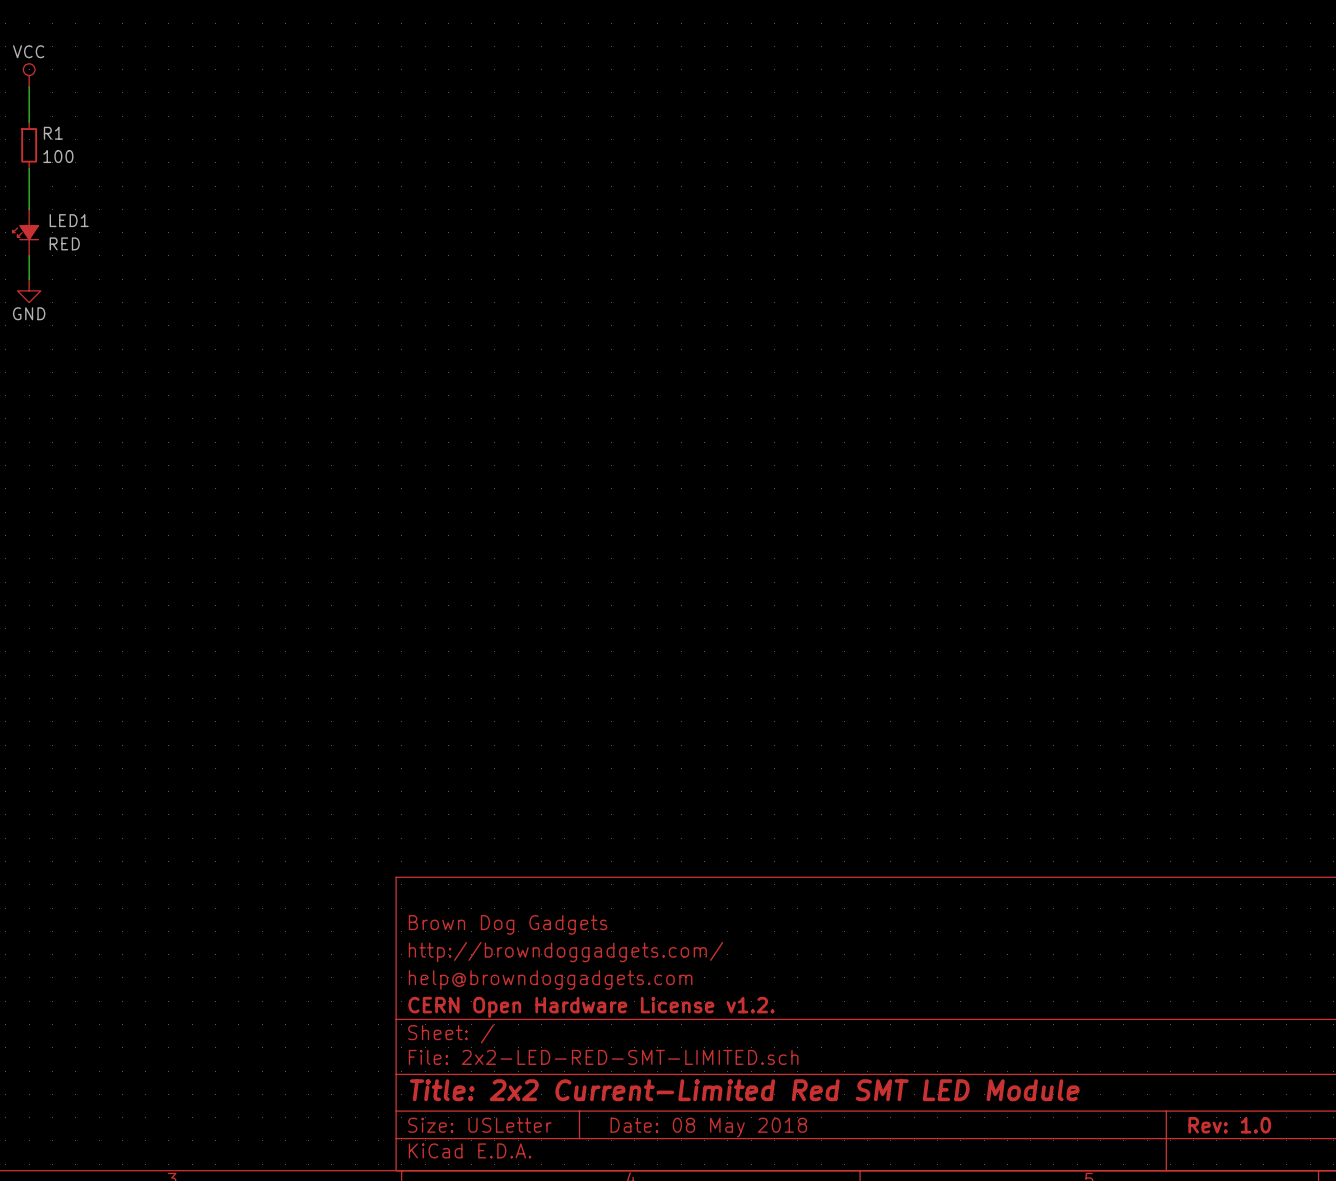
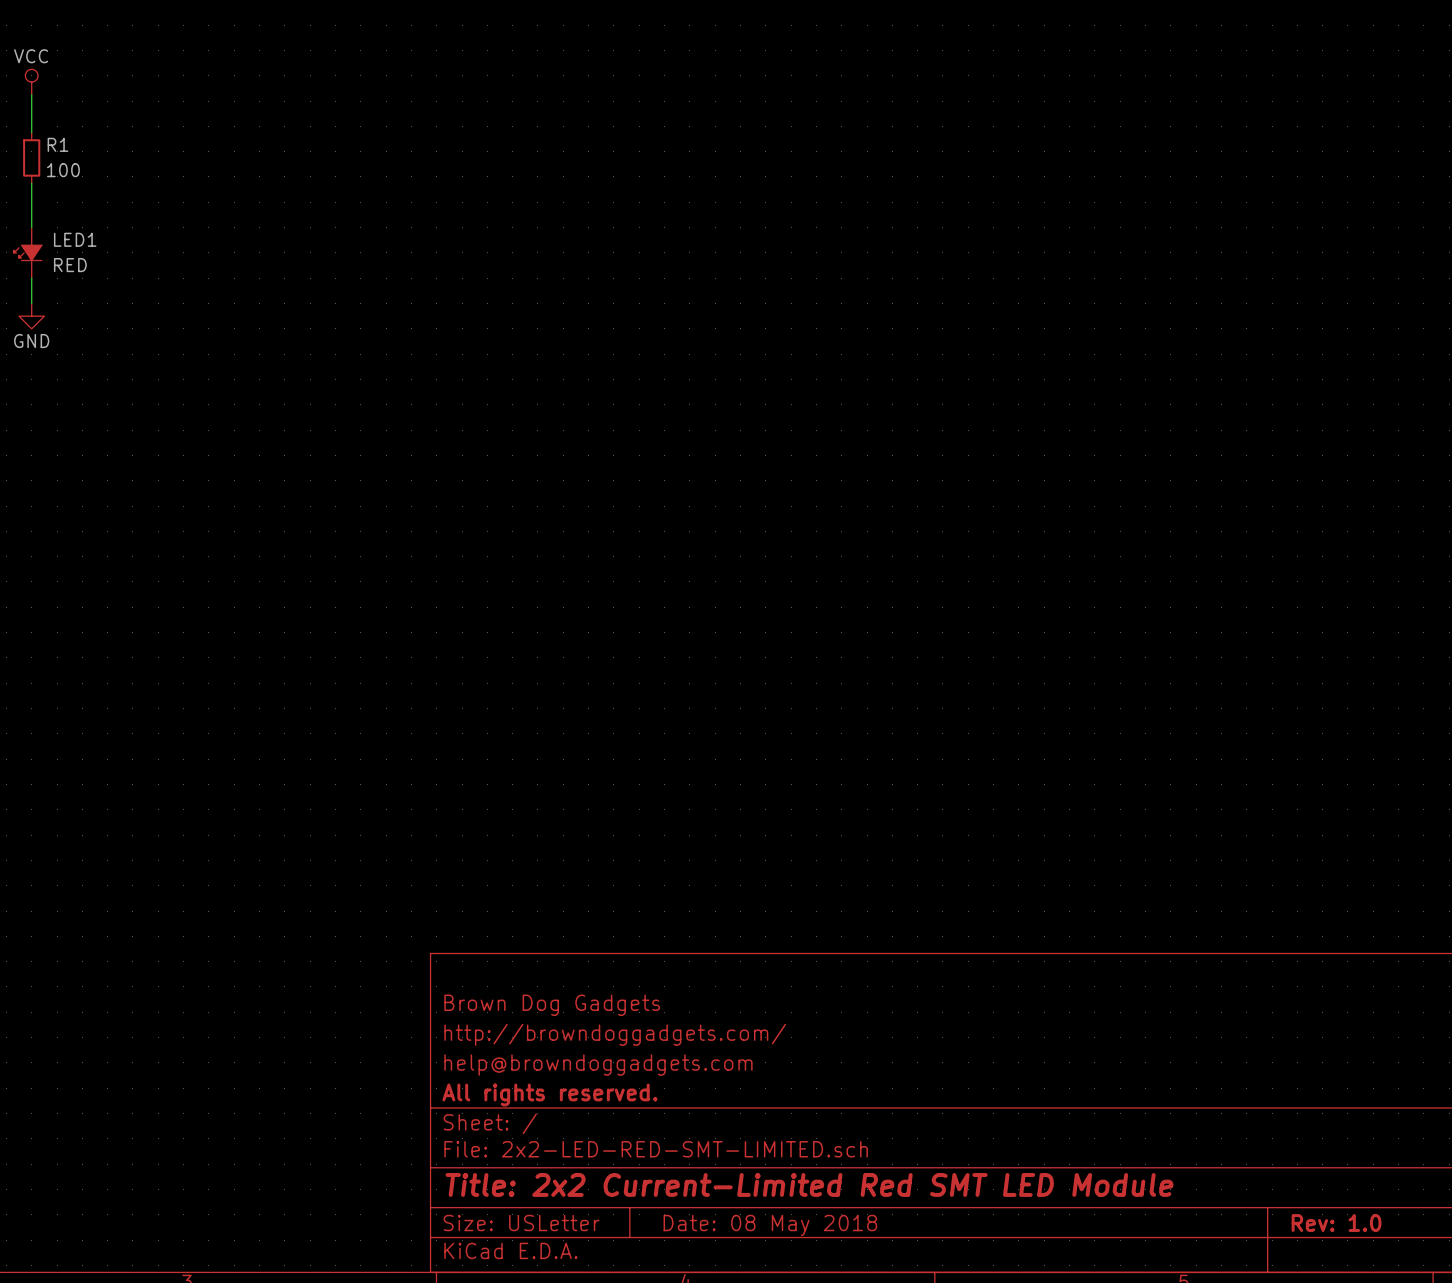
title block: CERN Open Hardware License v1.2. (591, 1007) -> All rights reserved. (549, 1094)

